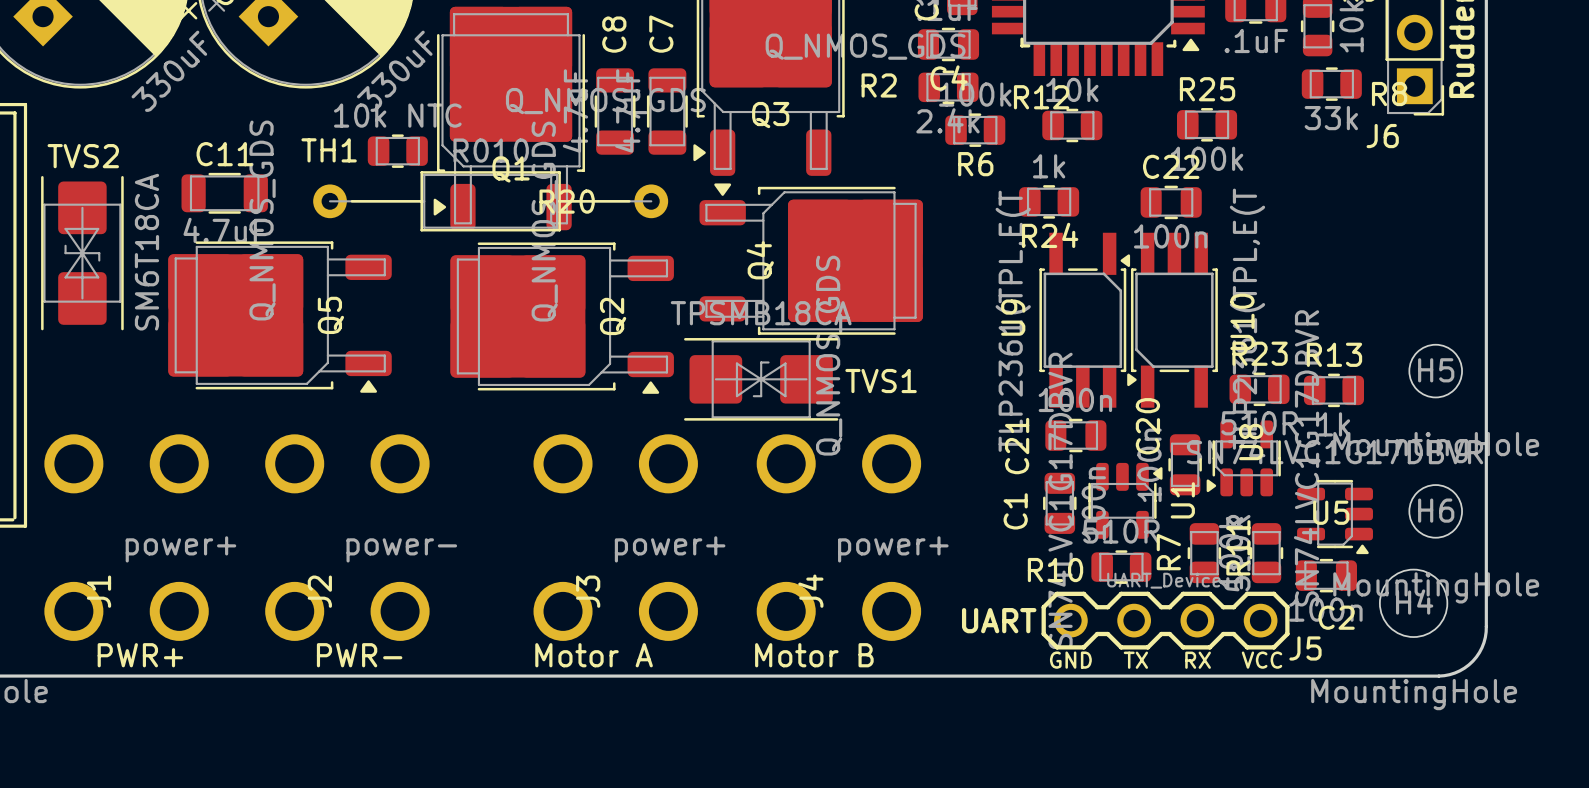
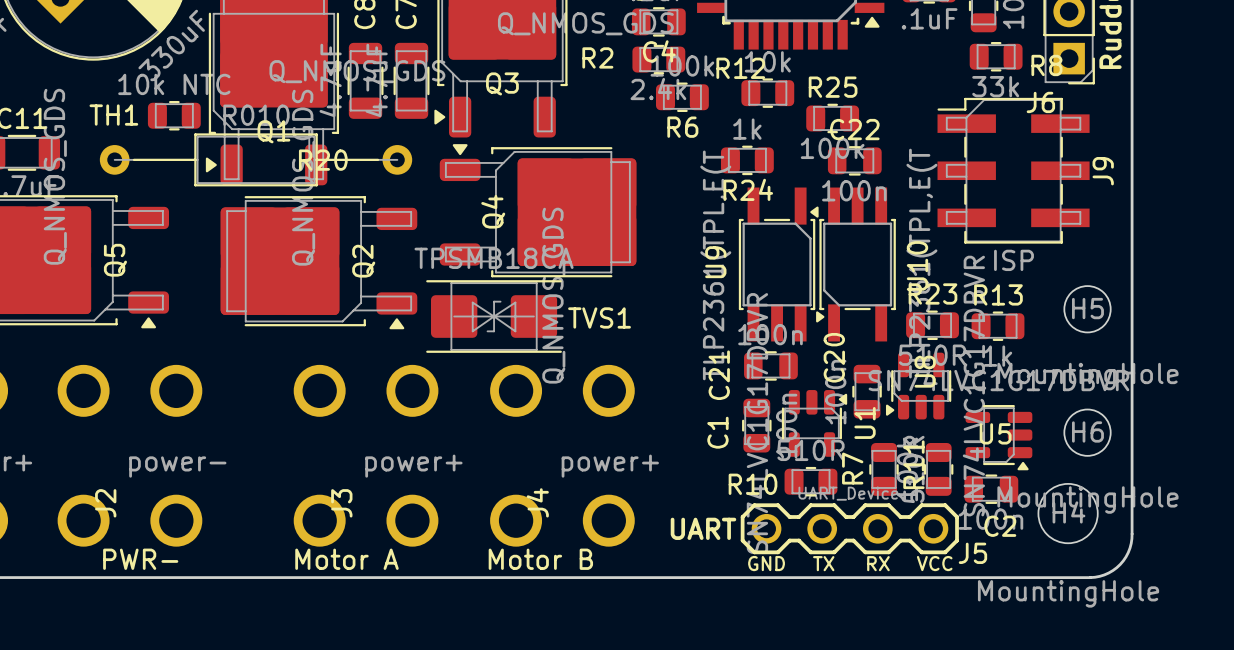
R25 position: (1207, 124) -> (832, 118)
J9: none -> ISP (1013, 170)

